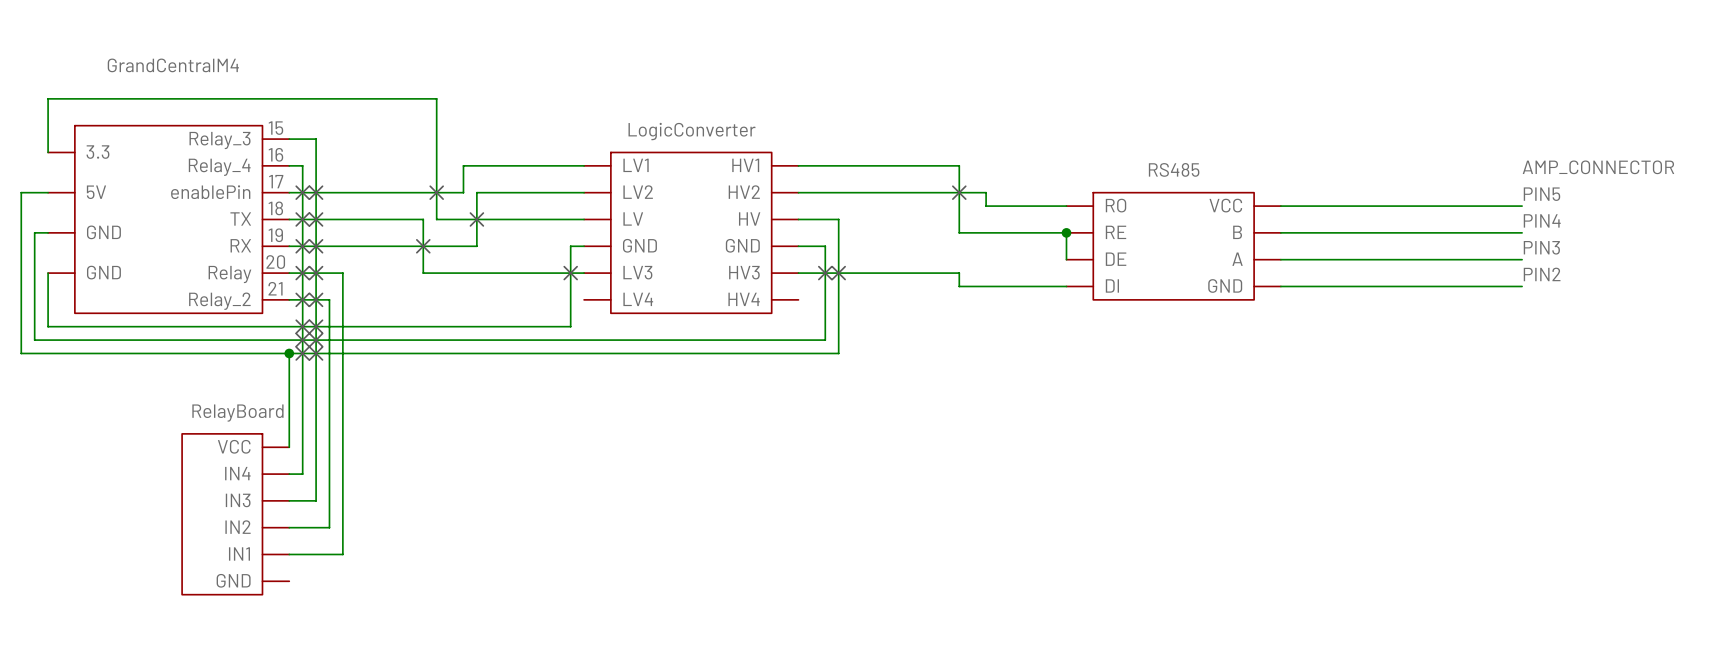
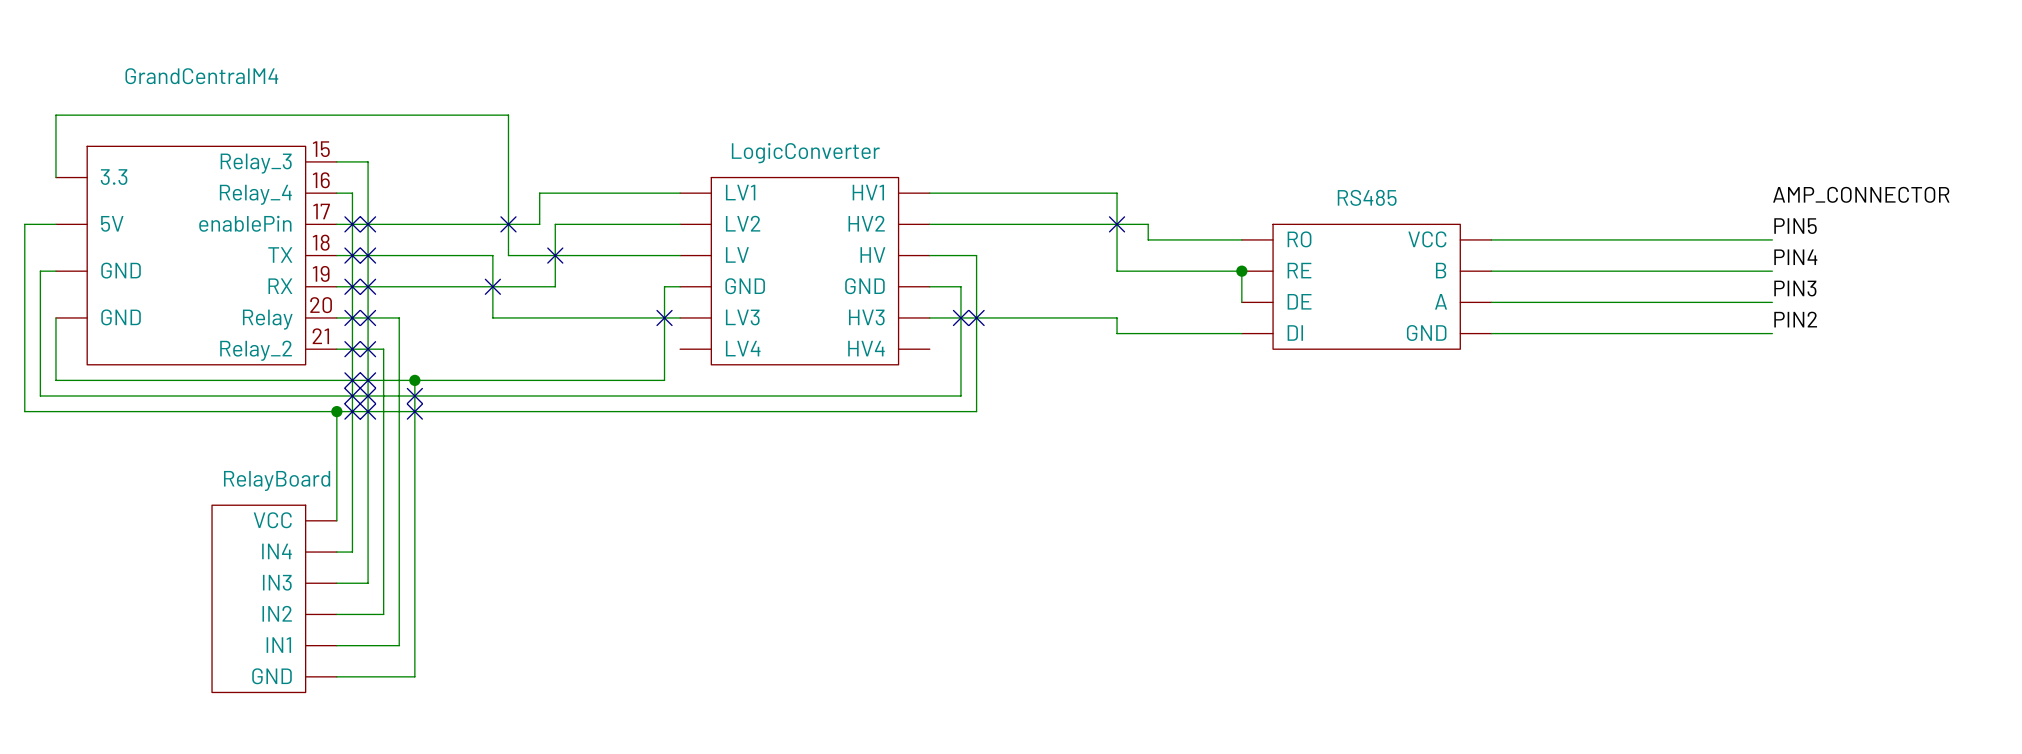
wire: none -> (414, 380) (414, 676) (336, 676)
junction: none -> (414, 380)
no-connect mark: none -> (414, 395)
no-connect mark: none -> (414, 411)

